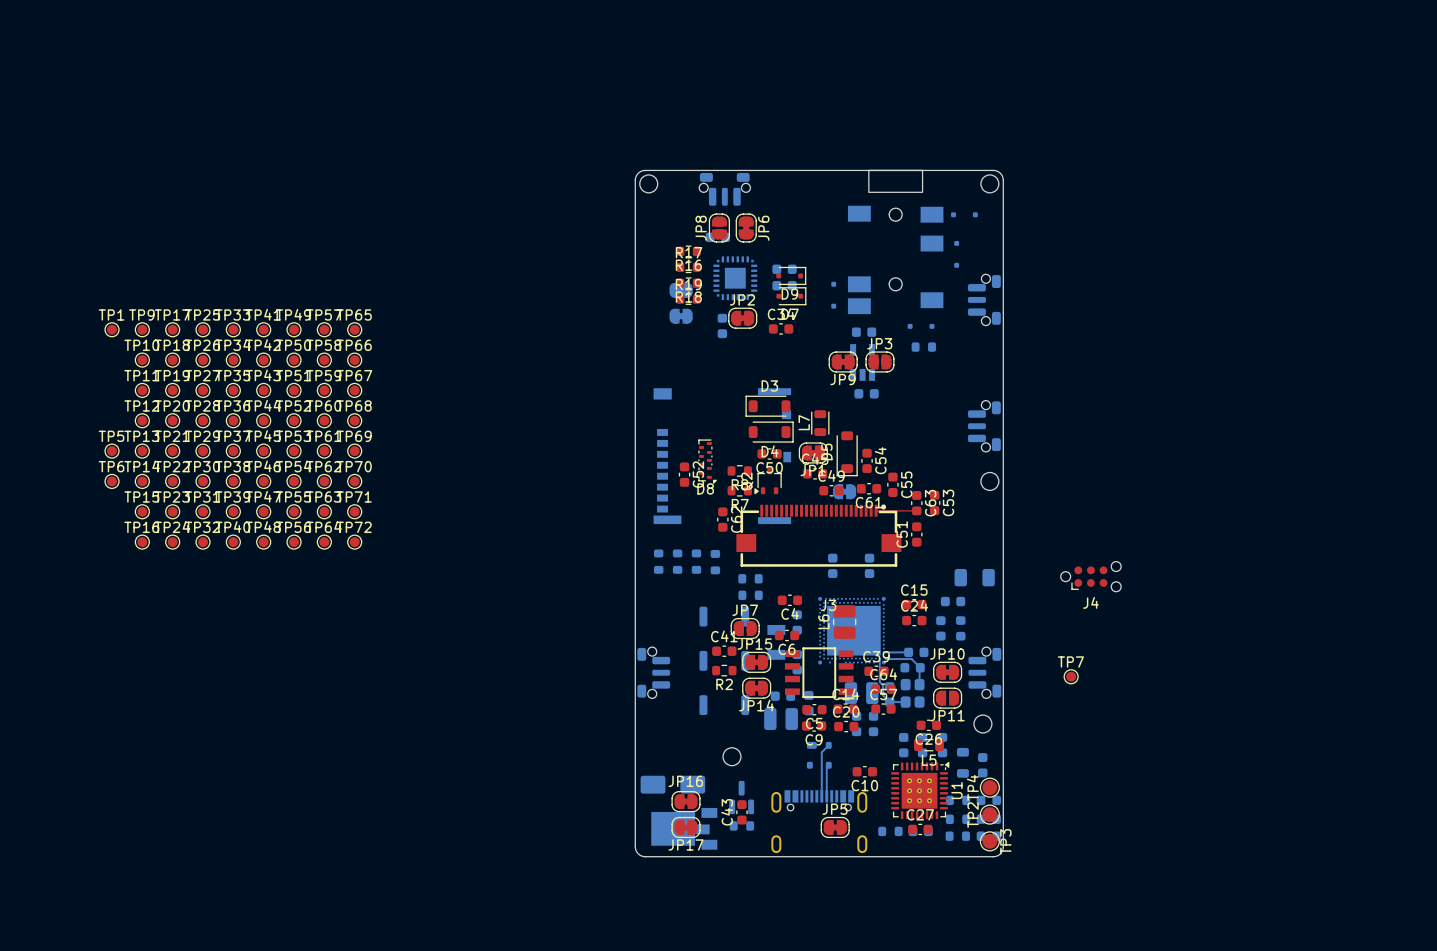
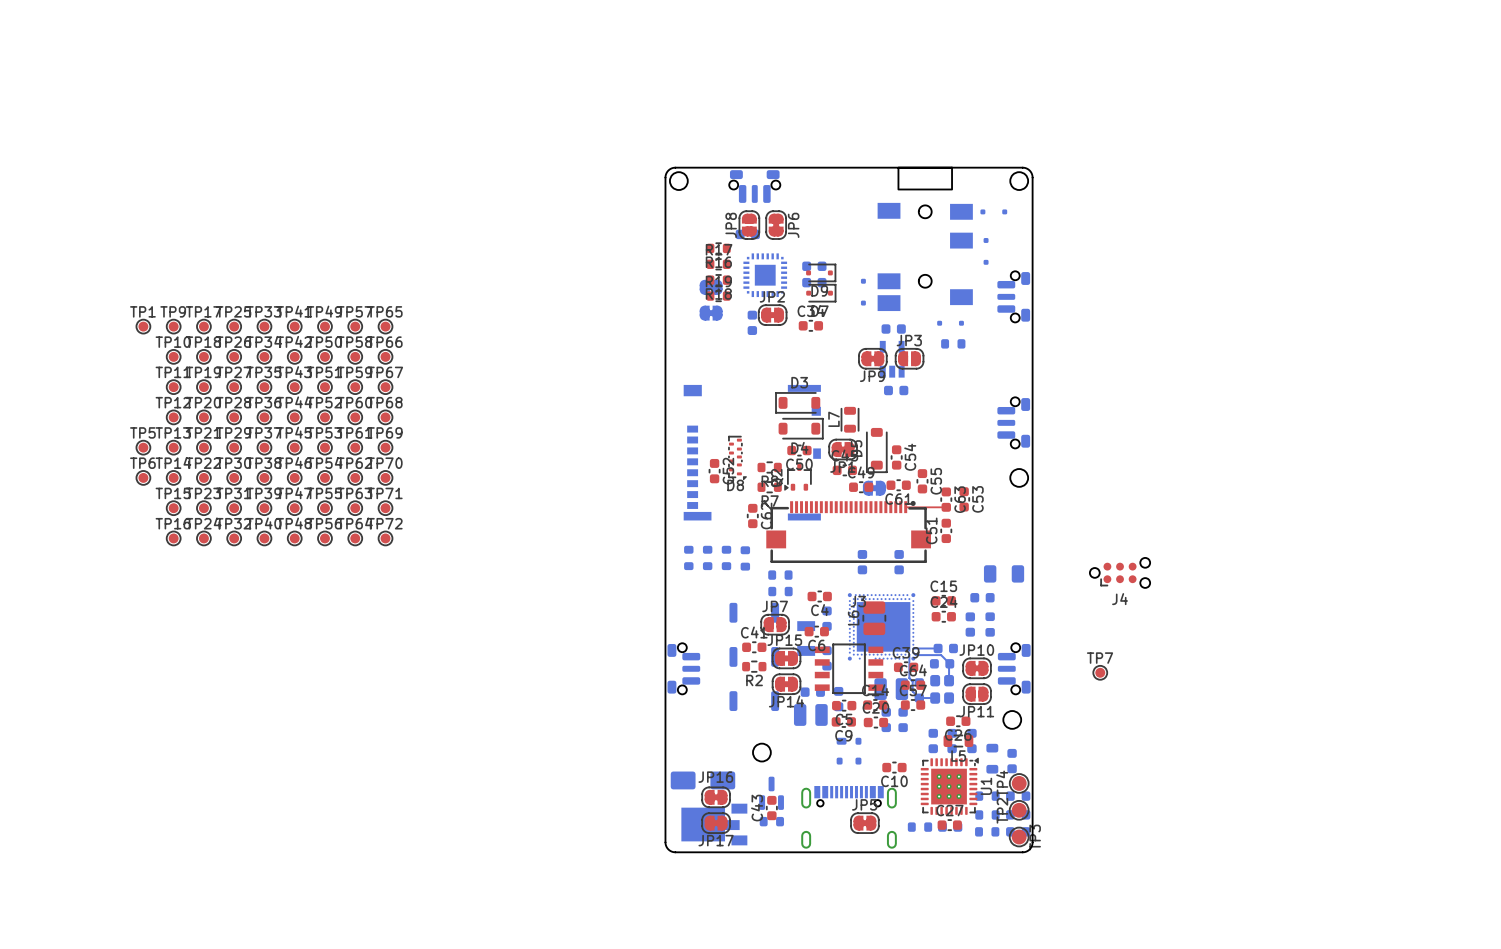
bottom track: (828, 745) (821, 752) (821, 796) -> none
bottom track: (828, 765) (826, 767) (826, 796) -> none

